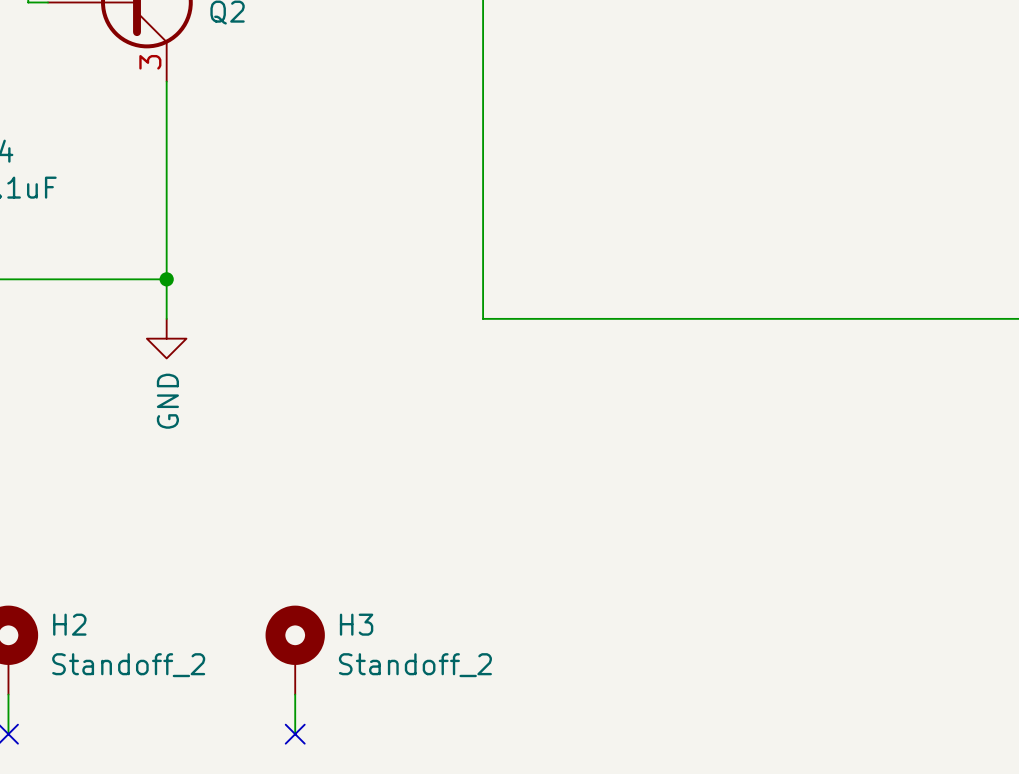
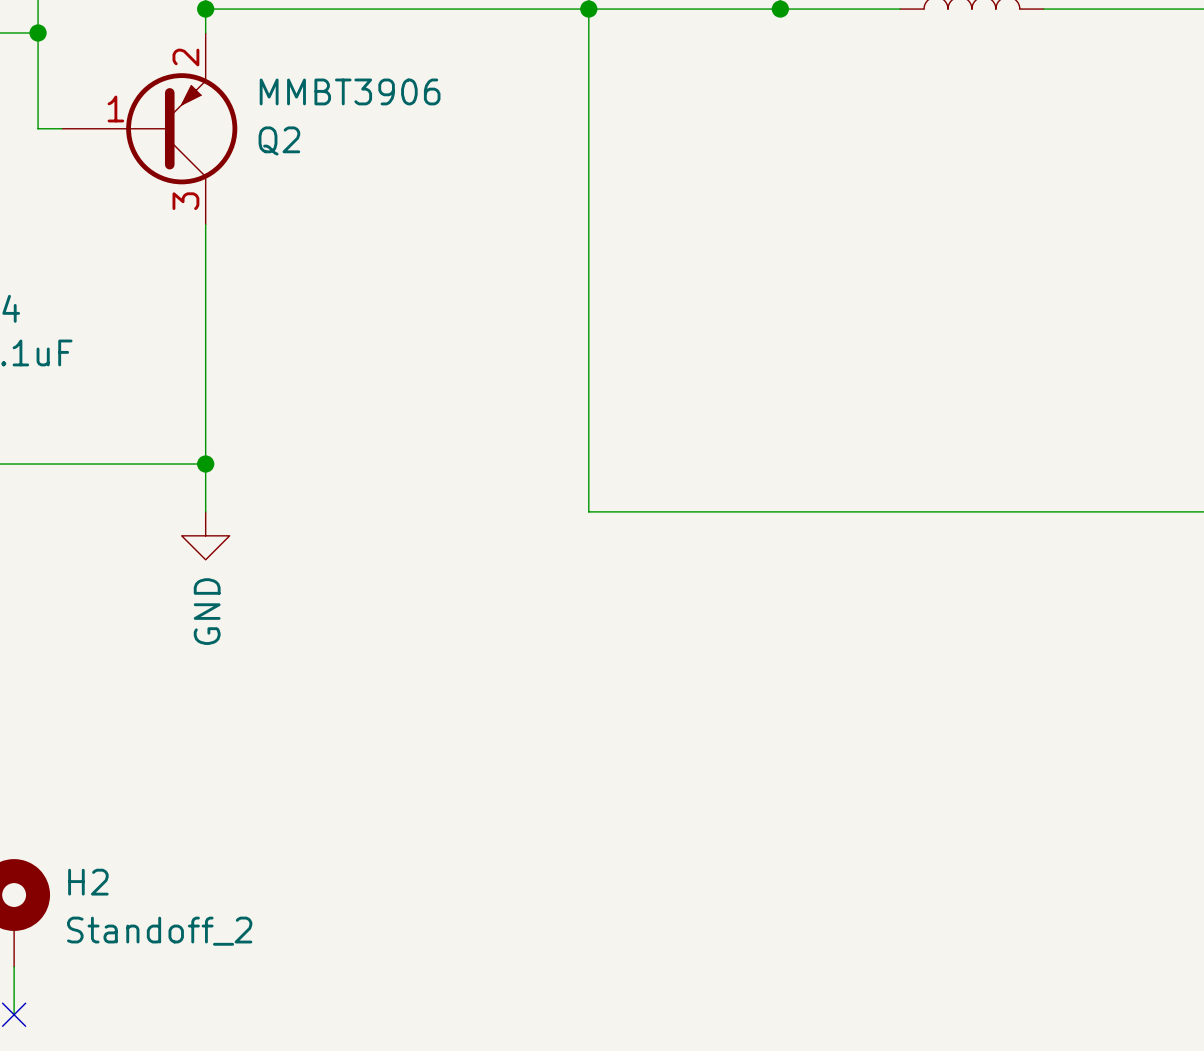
H3: Standoff_2 (295, 650) -> none
wire: (295, 694) (295, 734) -> none
no-connect mark: (295, 734) -> none

